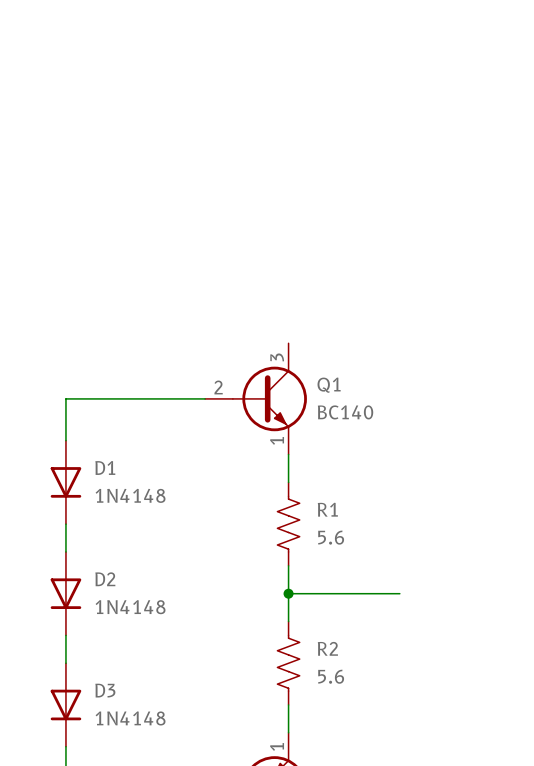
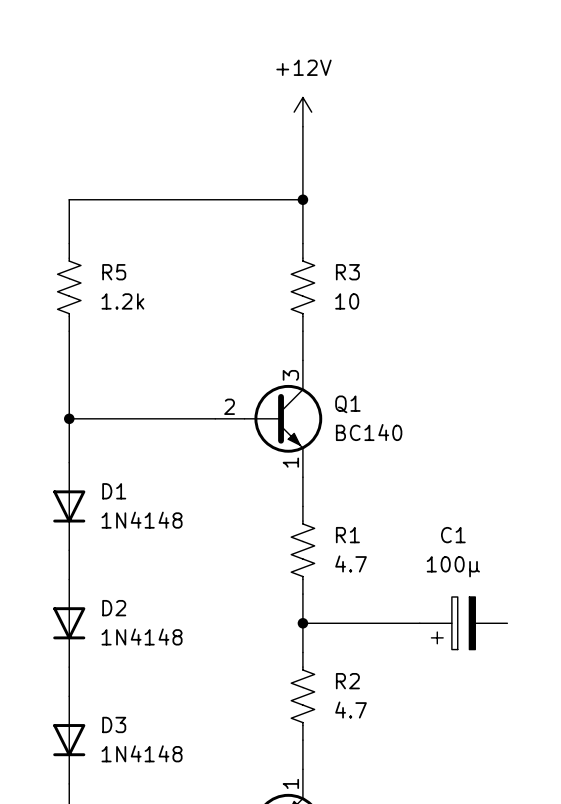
power symbol: none -> +12V (302, 112)
wire: none -> (302, 126) (302, 243)
wire: none -> (302, 199) (69, 199) (69, 243)
junction: none -> (302, 199)
R5: none -> 1.2k (69, 287)
R3: none -> 10 (302, 287)
wire: none -> (69, 331) (69, 418)
wire: none -> (302, 331) (302, 360)
junction: none -> (69, 418)
R1 value: 5.6 (331, 537) -> 4.7 (351, 563)
C1: none -> 100µ (463, 623)
R2 value: 5.6 (331, 676) -> 4.7 (351, 710)

